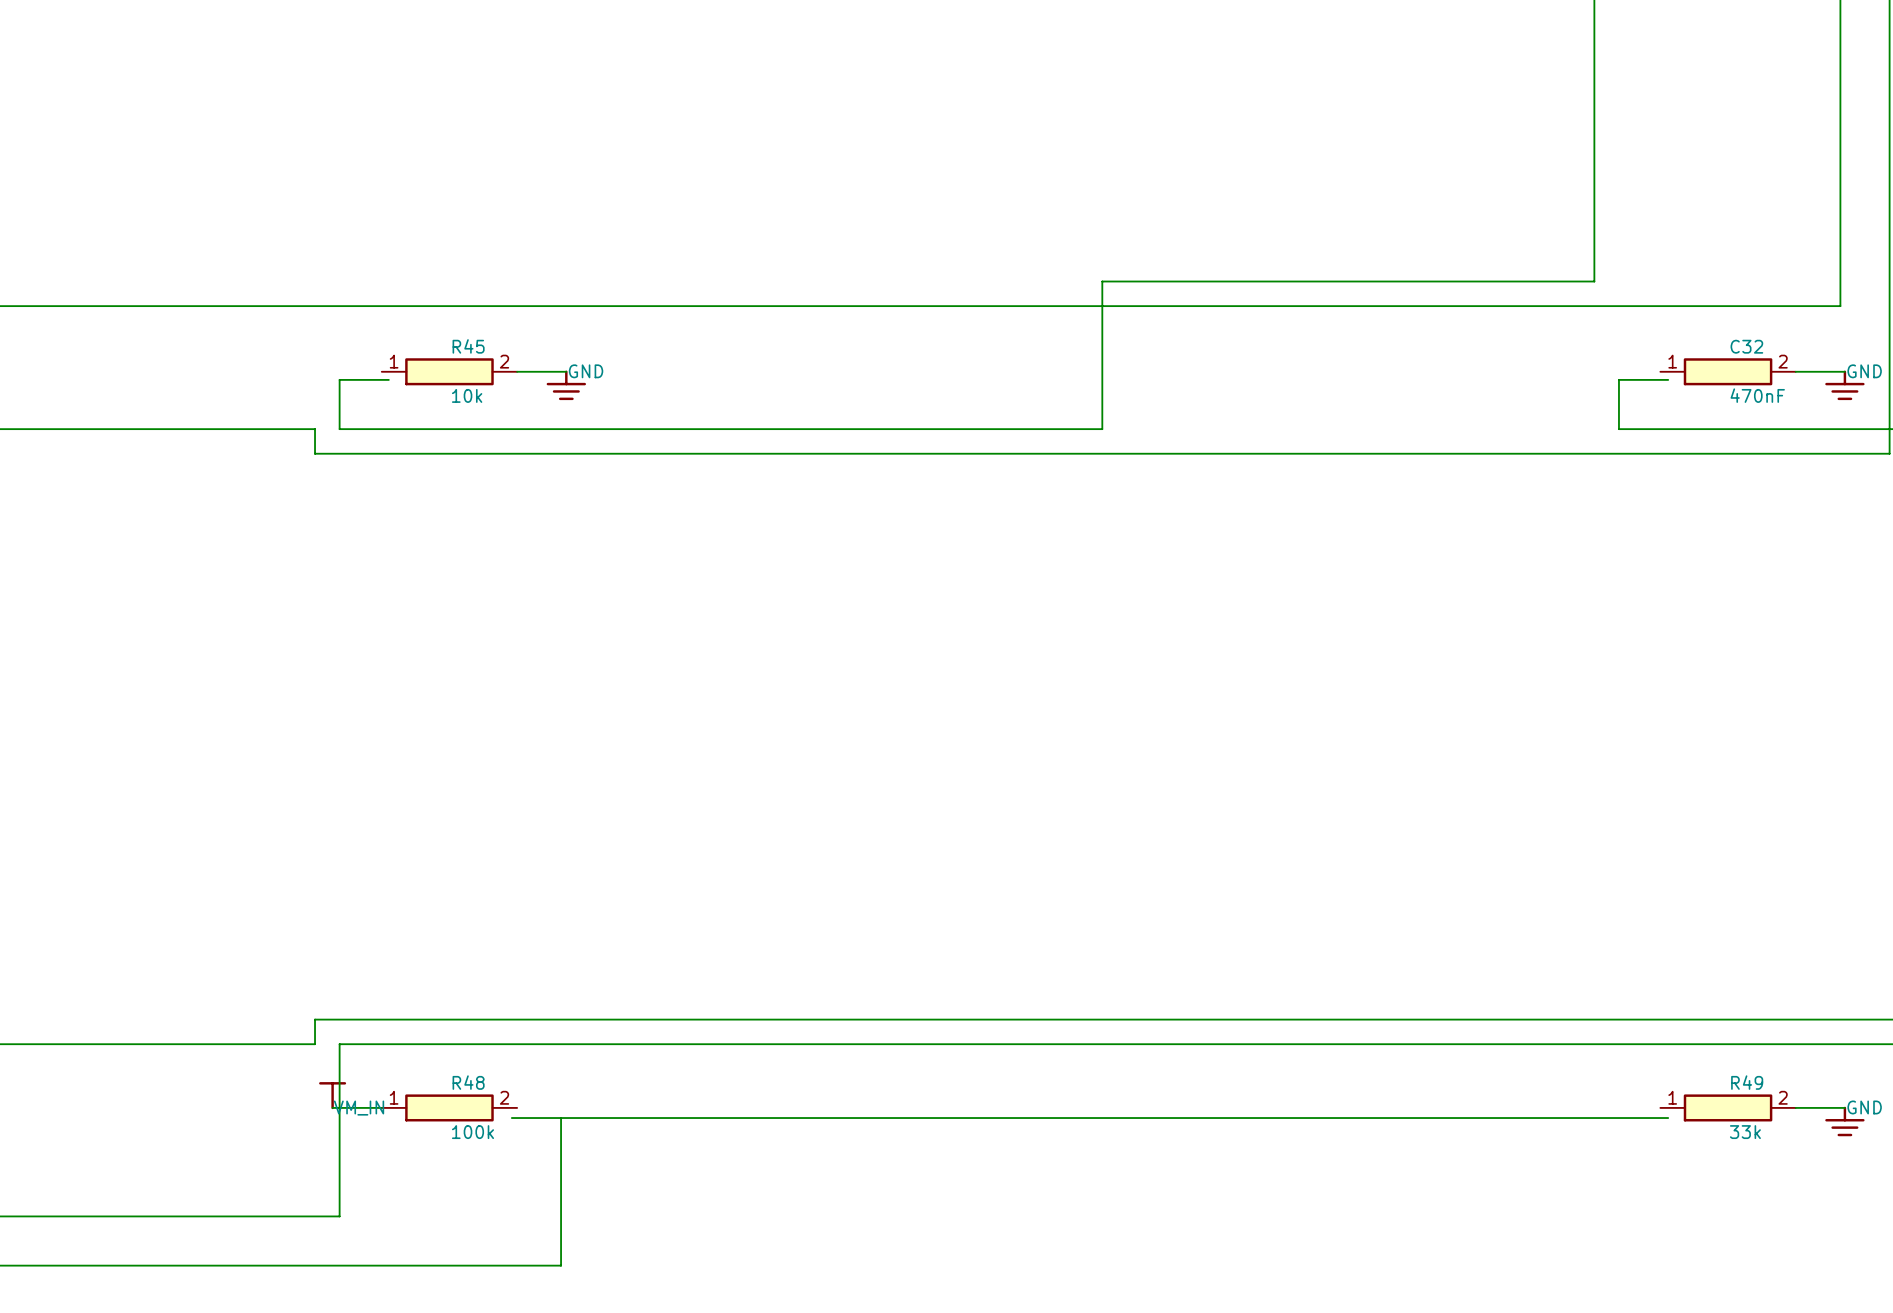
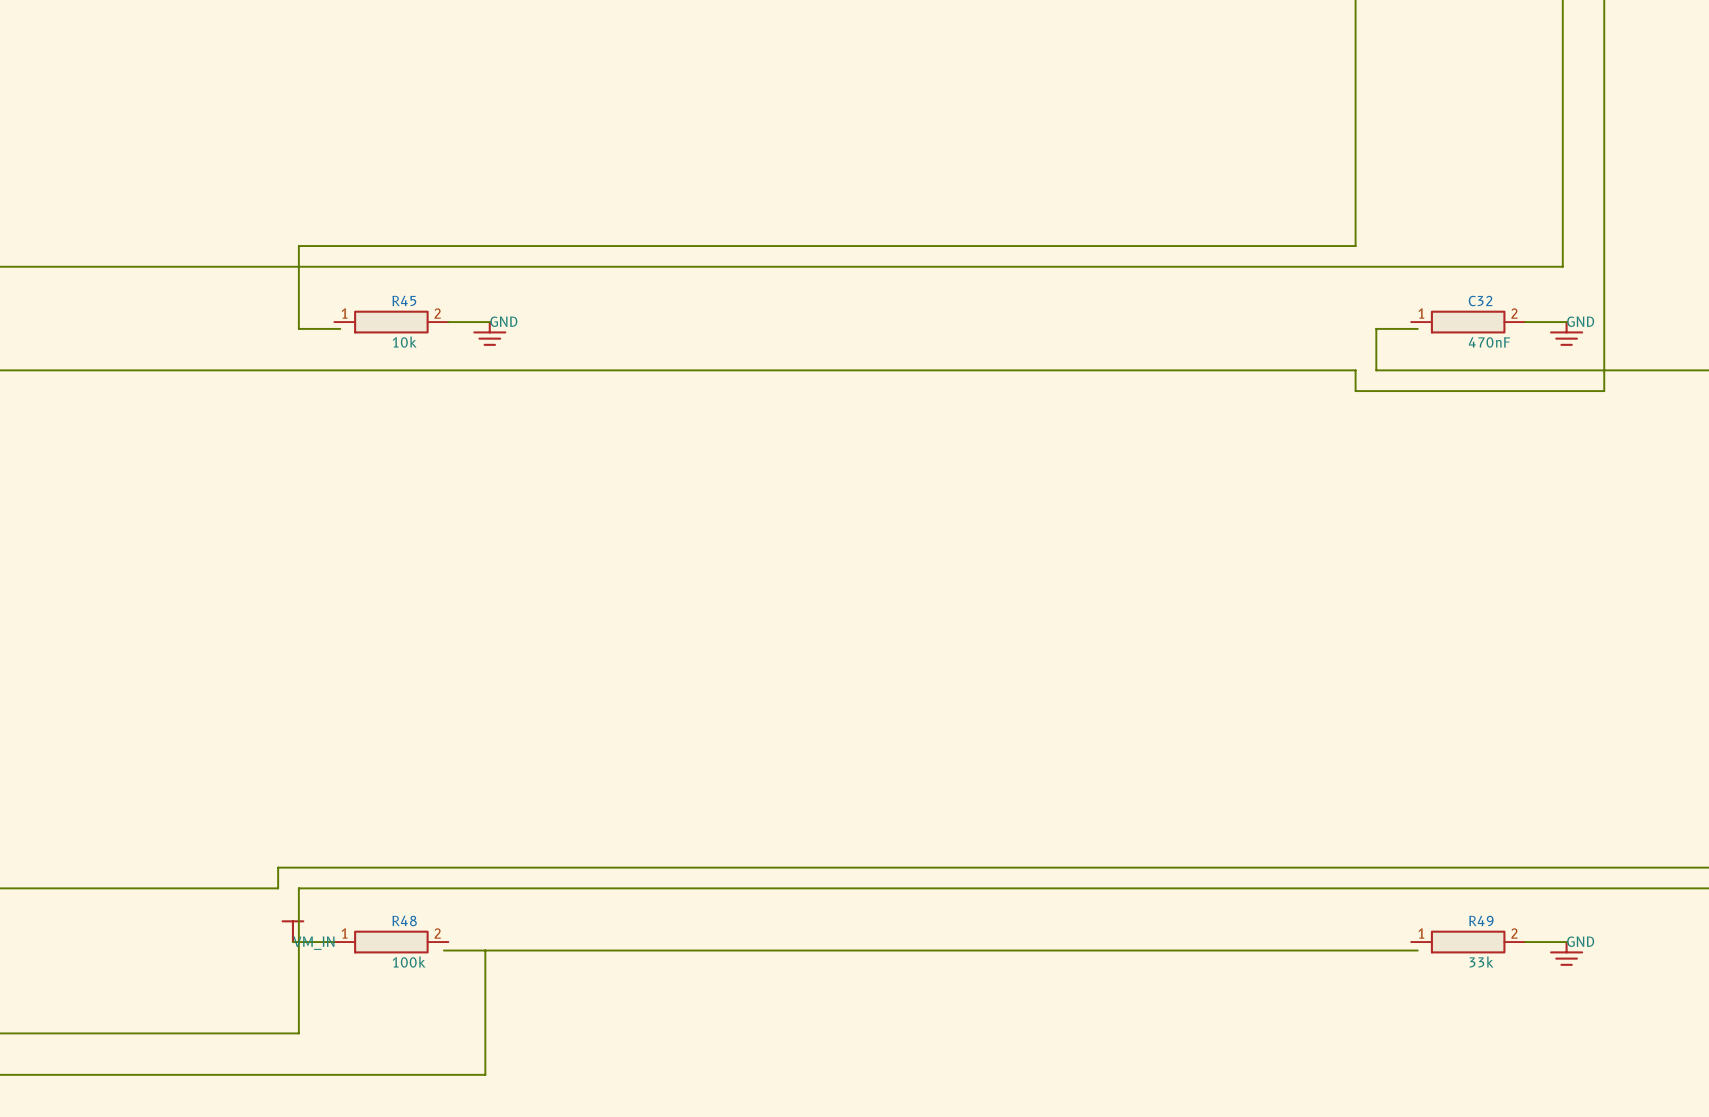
wire: (1102, 281) (1102, 429) -> (1355, 391) (1355, 370) (941, 370)
wire: none -> (941, 246) (298, 246) (298, 328)
wire: (339, 379) (339, 429) -> (278, 370) (298, 370)
wire: (315, 429) (315, 453) (1594, 453) -> none

